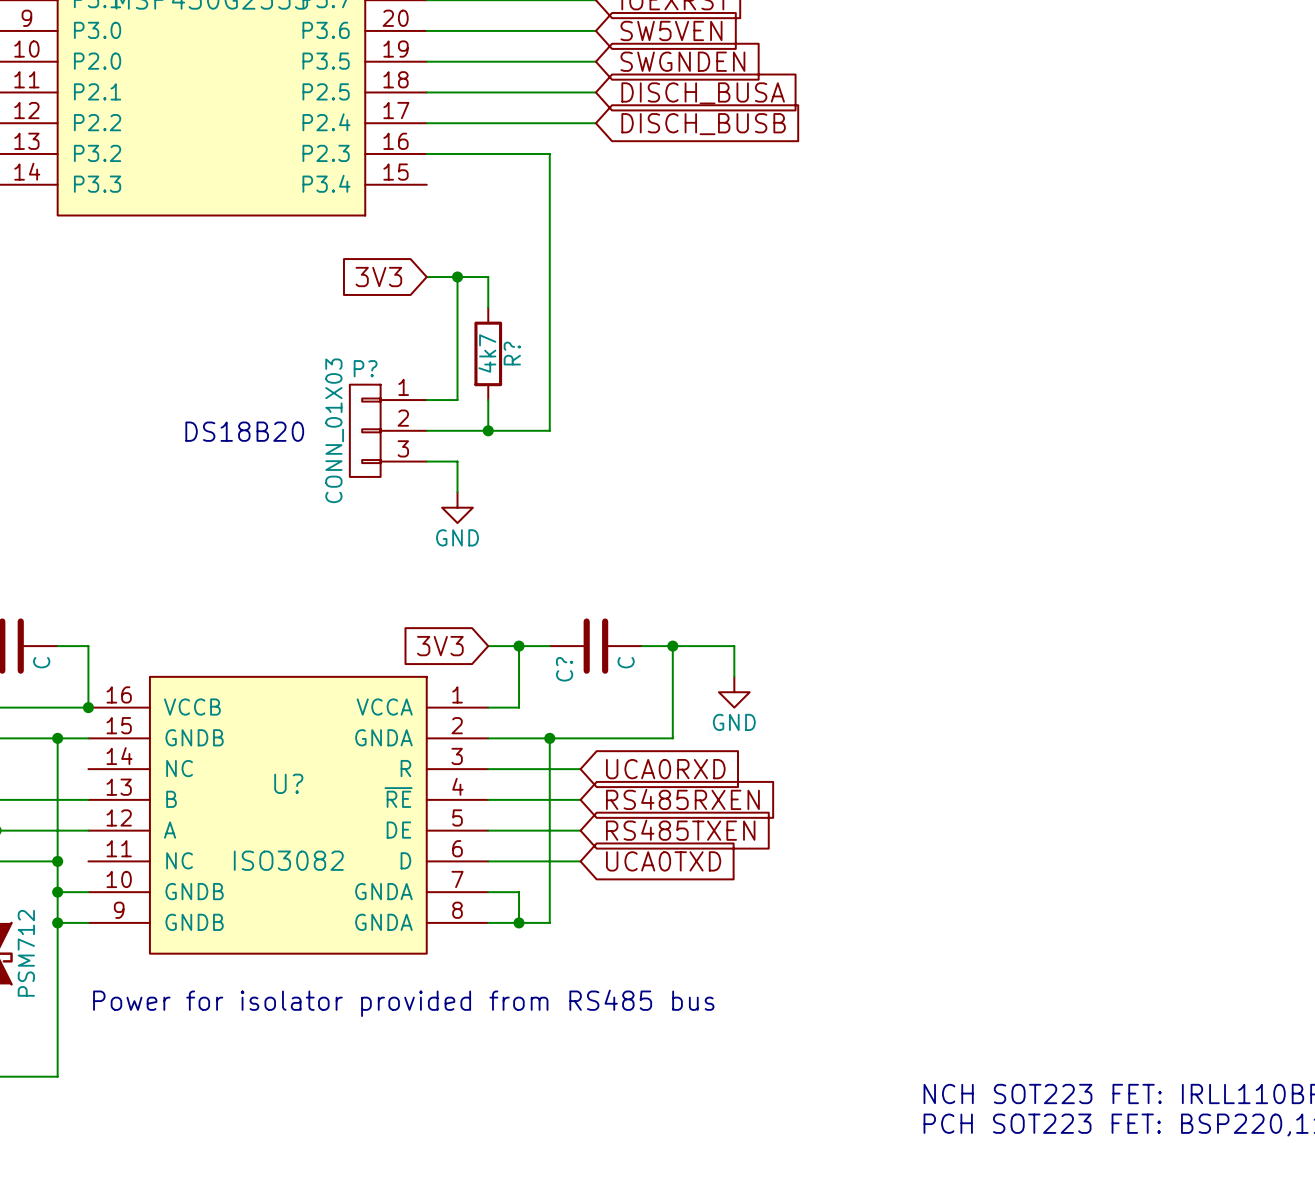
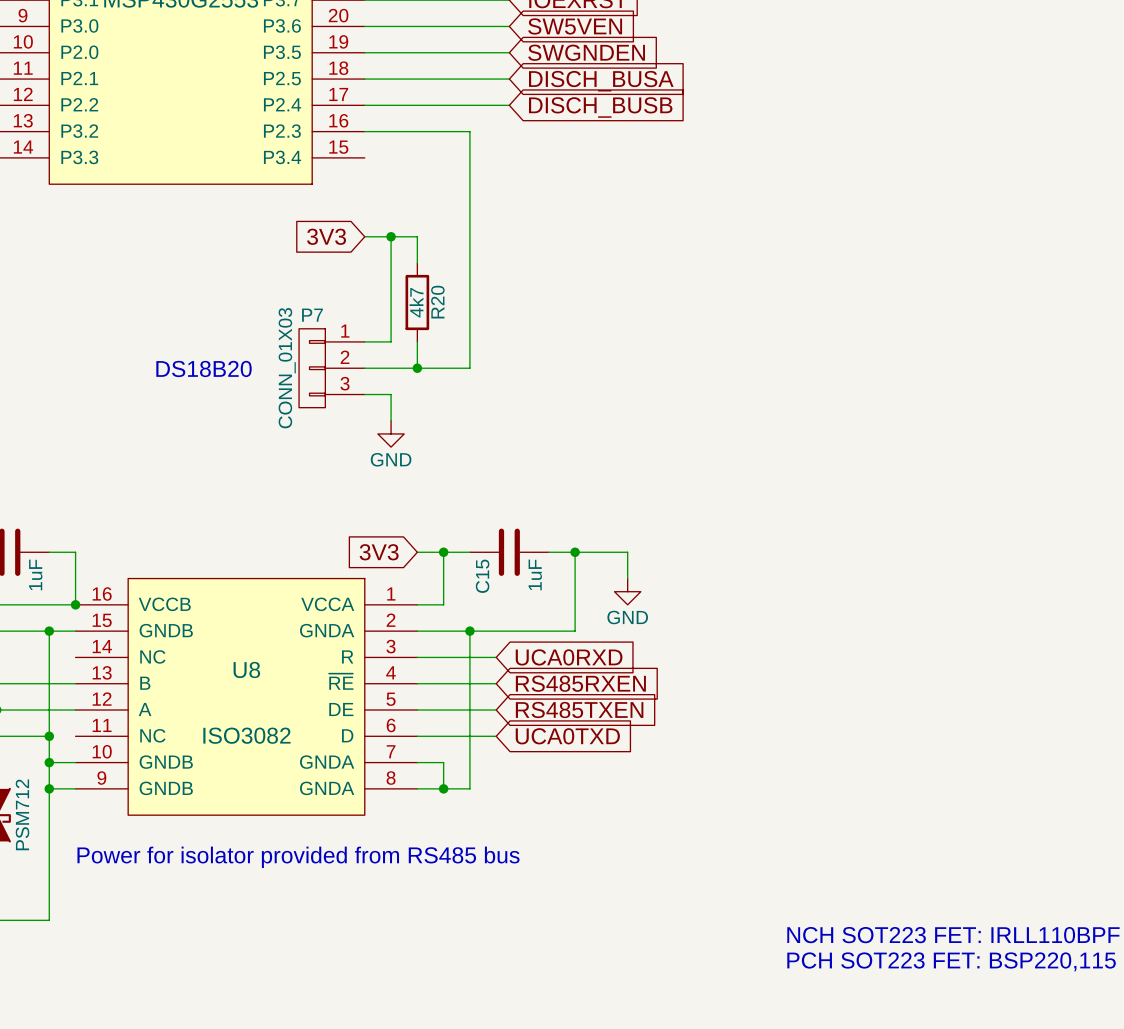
R? name: R? (512, 353) -> R20 (437, 302)
P? name: P? (365, 368) -> P7 (312, 315)
part value: C (41, 662) -> 1uF (35, 574)
C? value: C (626, 662) -> 1uF (535, 574)
C? name: C? (564, 669) -> C15 (482, 576)
U? name: U? (288, 783) -> U8 (246, 669)

